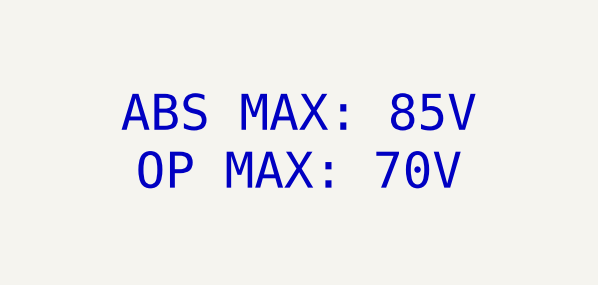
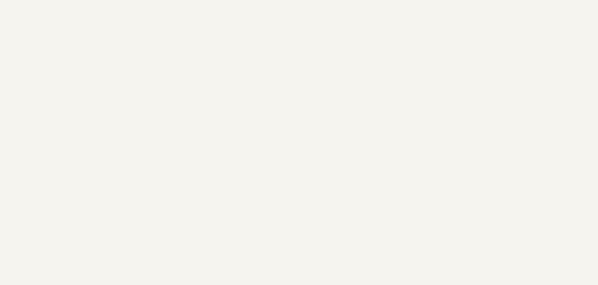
text: ABS MAX: 85V (298, 111) -> none
text: OP MAX: 70V (299, 169) -> none

